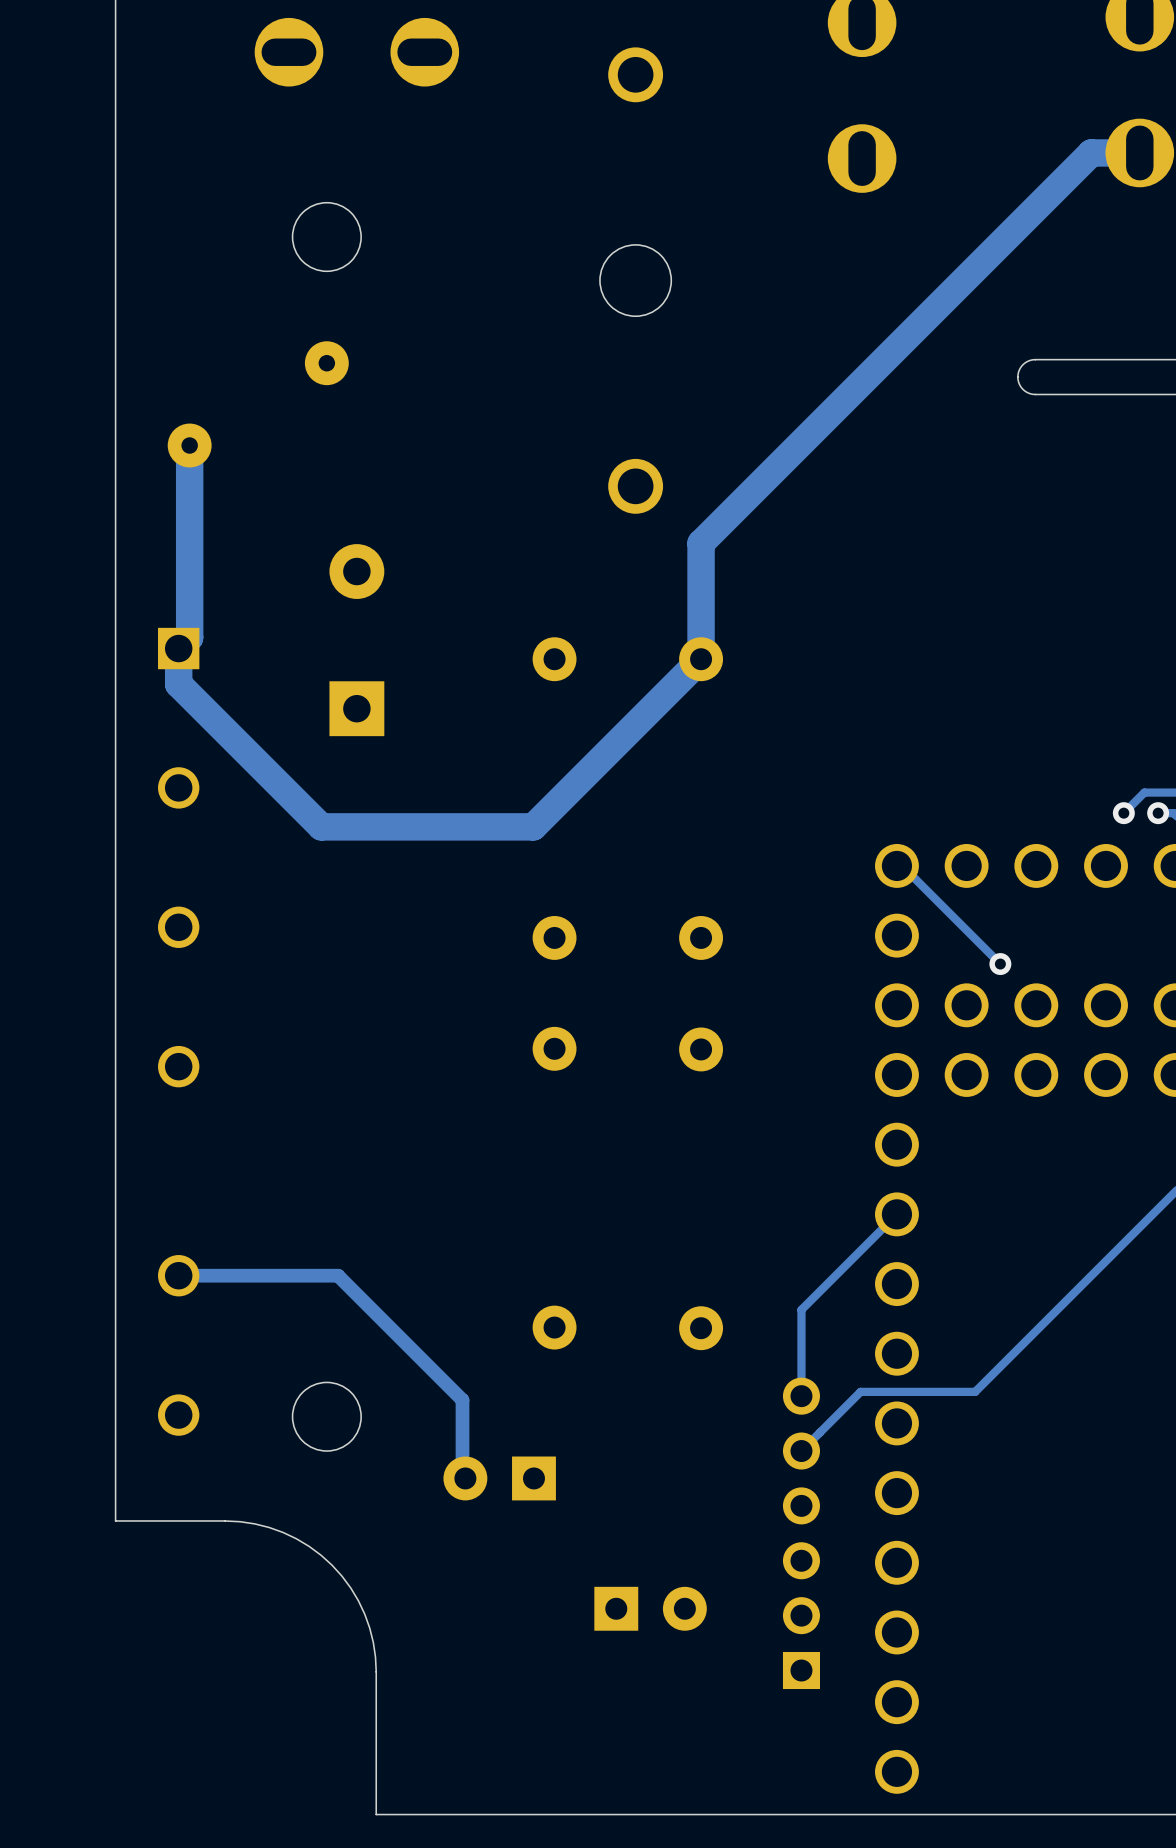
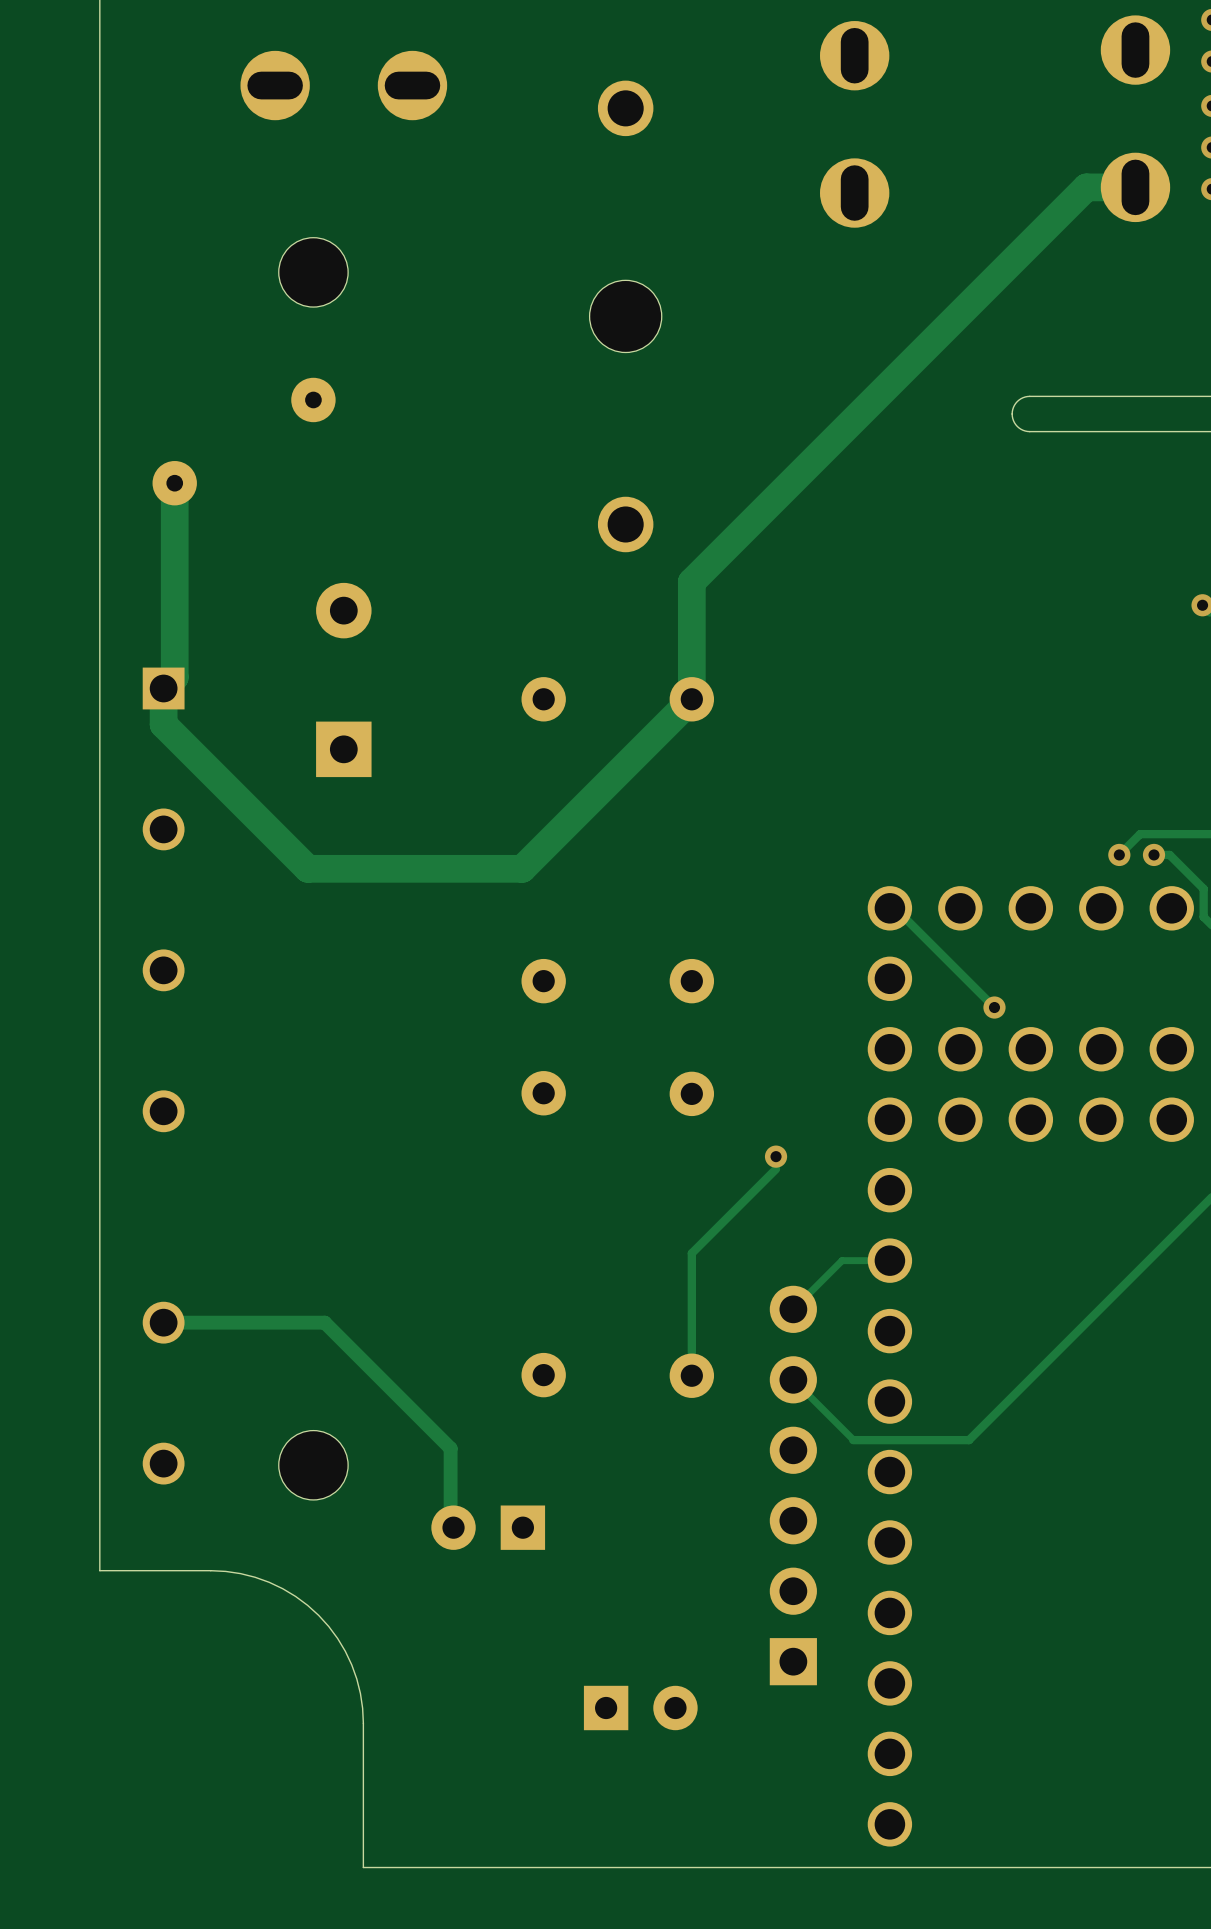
track: none -> (776, 1156) (776, 1169) (691, 1253) (691, 1375)
via: none -> (776, 1156)
track: (896, 1214) (801, 1309) (801, 1396) -> (889, 1260) (842, 1260) (793, 1309)
track: (860, 1391) (801, 1451) -> (853, 1439) (793, 1379)
part: none -> (793, 1485)
part: (801, 1533) -> none
part position: (650, 1608) -> (640, 1708)

